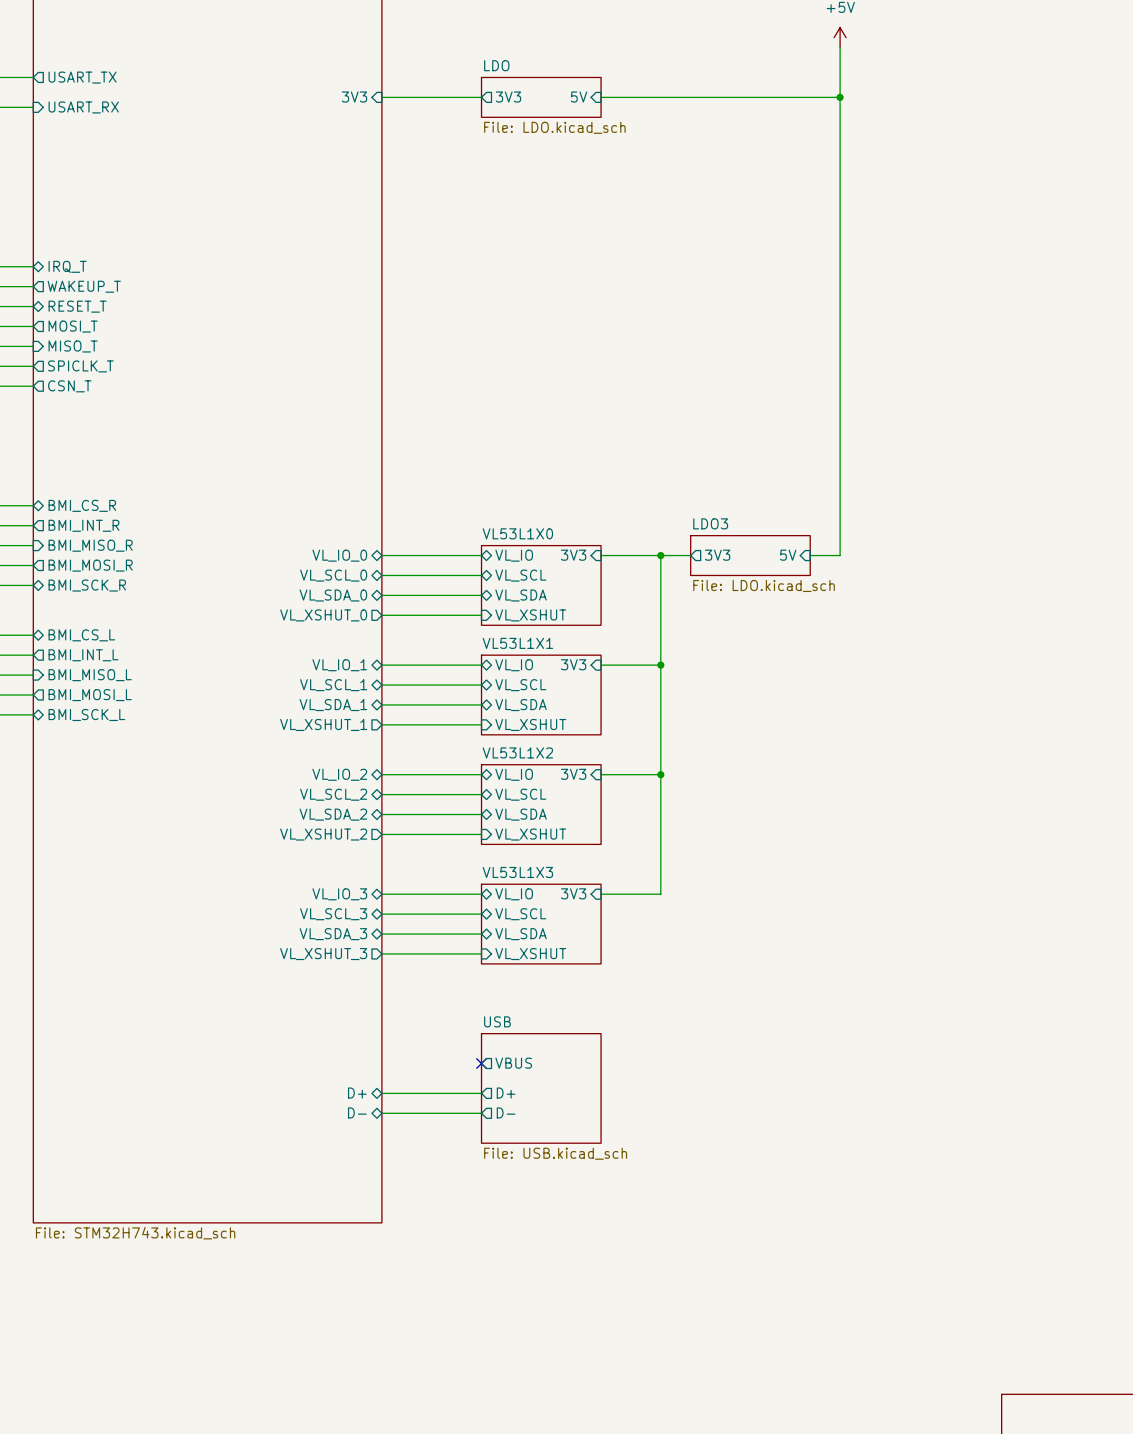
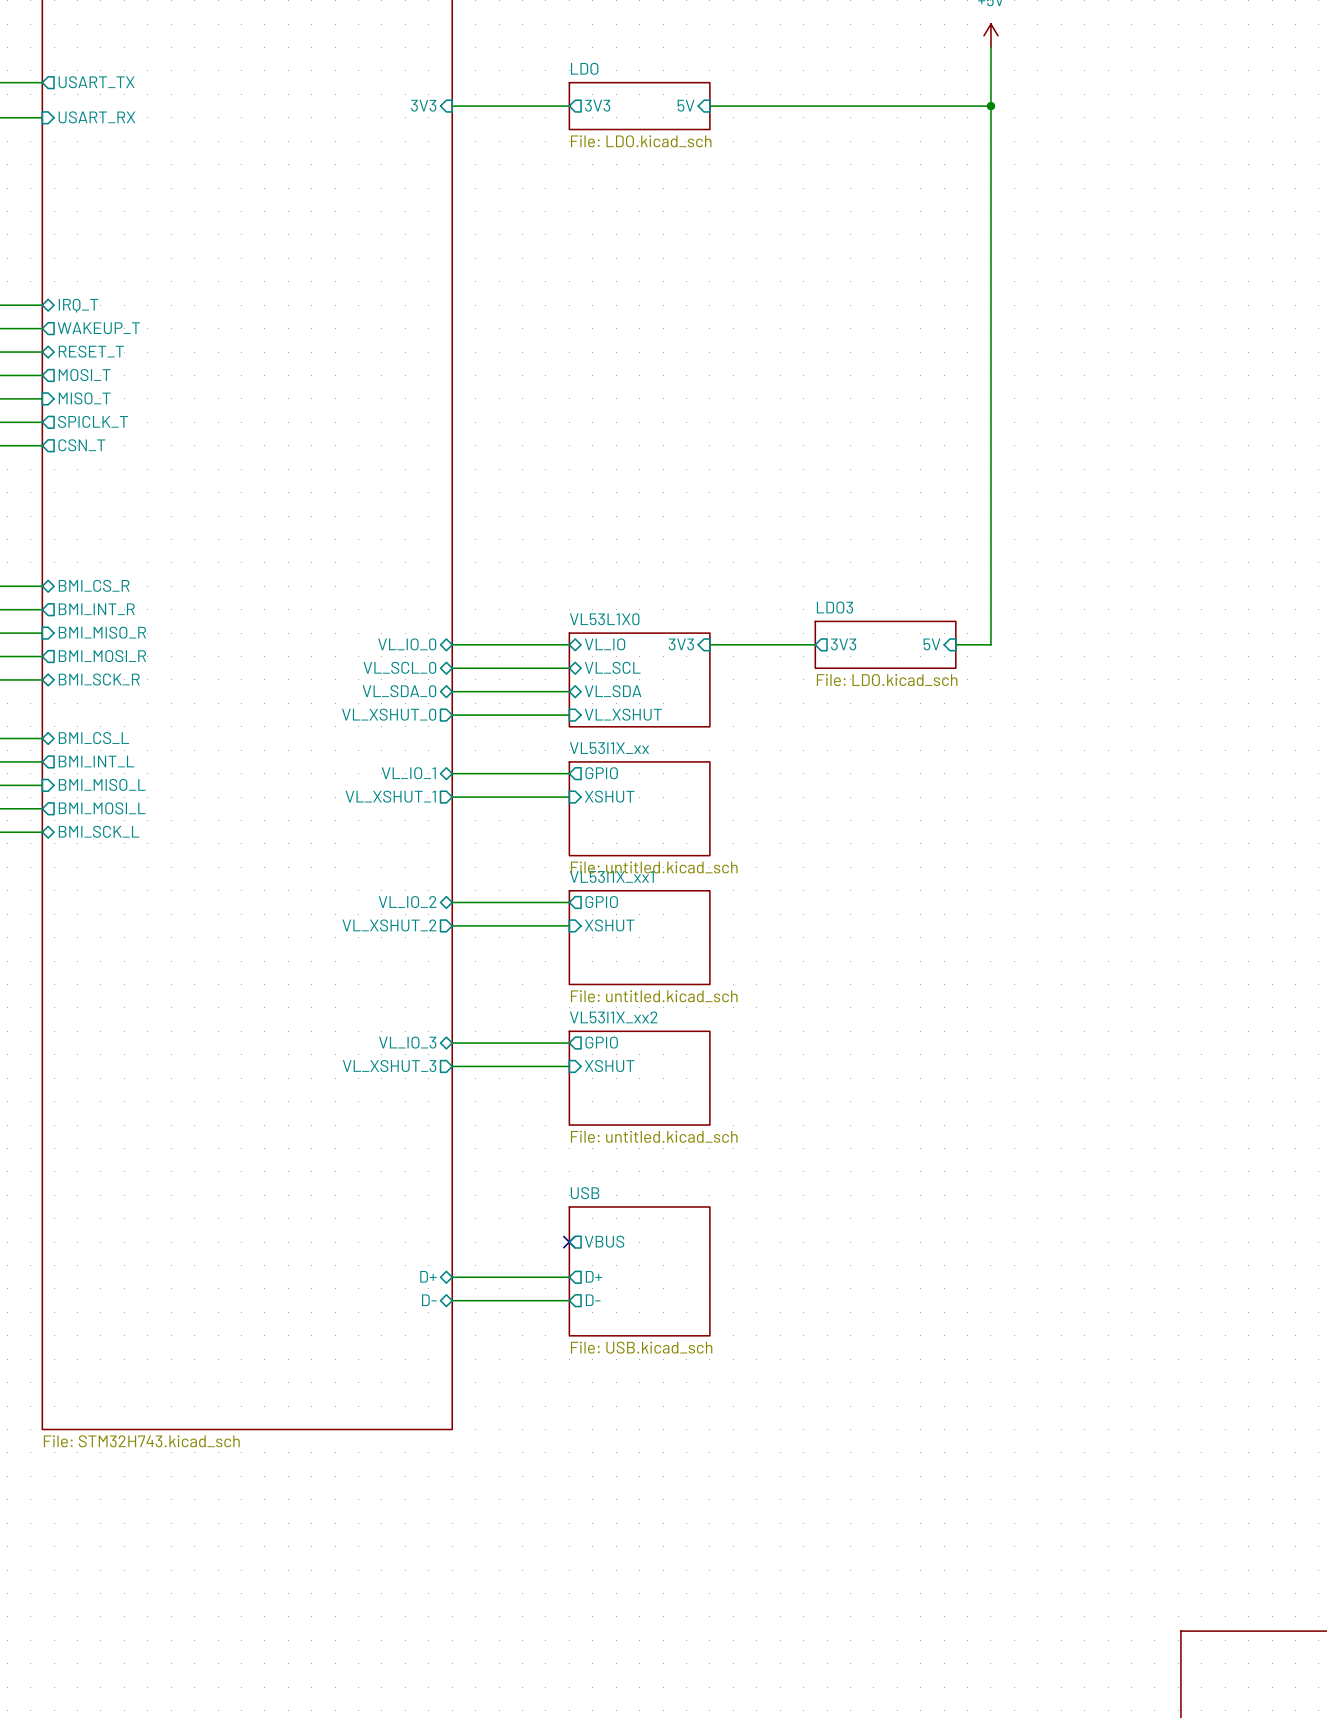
wire: (660, 555) (660, 894) (601, 894) -> none
junction: (660, 555) -> none
sheet VL53L1X1 name: VL53L1X1 (517, 643) -> VL53l1X_xx (609, 748)
sheet pin: 3V3 (573, 664) -> none
sheet pin shape: bidirectional (514, 665) -> output (601, 773)
sheet pin: VL_IO (514, 665) -> GPIO (601, 773)
wire: (601, 665) (660, 665) -> none
junction: (660, 665) -> none
sheet pin shape: bidirectional (333, 685) -> output (390, 796)
sheet pin: VL_SCL_1 (333, 685) -> VL_XSHUT_1 (390, 796)
sheet pin shape: bidirectional (520, 685) -> input (609, 796)
sheet pin: VL_SCL (520, 685) -> XSHUT (609, 796)
wire: (381, 704) (481, 704) -> none
sheet pin: VL_SDA_1 (333, 705) -> none
sheet pin: VL_SDA (521, 705) -> none
sheet pin: VL_XSHUT_1 (323, 724) -> none
wire: (381, 724) (481, 724) -> none
sheet pin: VL_XSHUT (530, 724) -> none
sheet VL53L1X1 value: none -> File: untitled.kicad_sch (654, 867)
sheet VL53L1X2 name: VL53L1X2 (517, 752) -> VL53l1X_xx1 (611, 876)
sheet pin shape: bidirectional (514, 774) -> output (601, 902)
sheet pin: VL_IO (514, 774) -> GPIO (601, 902)
sheet pin: 3V3 (573, 774) -> none
wire: (601, 774) (660, 774) -> none
junction: (660, 774) -> none
sheet pin shape: bidirectional (333, 794) -> output (389, 925)
sheet pin: VL_SCL_2 (333, 794) -> VL_XSHUT_2 (389, 925)
sheet pin shape: bidirectional (520, 794) -> input (609, 925)
sheet pin: VL_SCL (520, 794) -> XSHUT (609, 925)
sheet pin: VL_SDA_2 (333, 814) -> none
wire: (381, 814) (481, 814) -> none
sheet pin: VL_SDA (521, 814) -> none
sheet pin: VL_XSHUT_2 (323, 834) -> none
wire: (381, 834) (481, 834) -> none
sheet pin: VL_XSHUT (530, 834) -> none
sheet VL53L1X2 value: none -> File: untitled.kicad_sch (654, 996)
sheet VL53L1X3 name: VL53L1X3 (517, 872) -> VL53l1X_xx2 (613, 1017)
sheet pin: 3V3 (573, 893) -> none
sheet pin shape: bidirectional (514, 894) -> output (601, 1042)
sheet pin: VL_IO (514, 894) -> GPIO (601, 1042)
sheet pin shape: bidirectional (333, 914) -> output (389, 1066)
sheet pin: VL_SCL_3 (333, 914) -> VL_XSHUT_3 (389, 1066)
sheet pin shape: bidirectional (520, 914) -> input (609, 1066)
sheet pin: VL_SCL (520, 914) -> XSHUT (609, 1066)
sheet pin: VL_SDA_3 (333, 934) -> none
wire: (381, 934) (481, 934) -> none
sheet pin: VL_SDA (521, 934) -> none
wire: (381, 953) (481, 953) -> none
sheet pin: VL_XSHUT_3 (323, 954) -> none
sheet pin: VL_XSHUT (530, 954) -> none
sheet VL53L1X3 value: none -> File: untitled.kicad_sch (654, 1136)

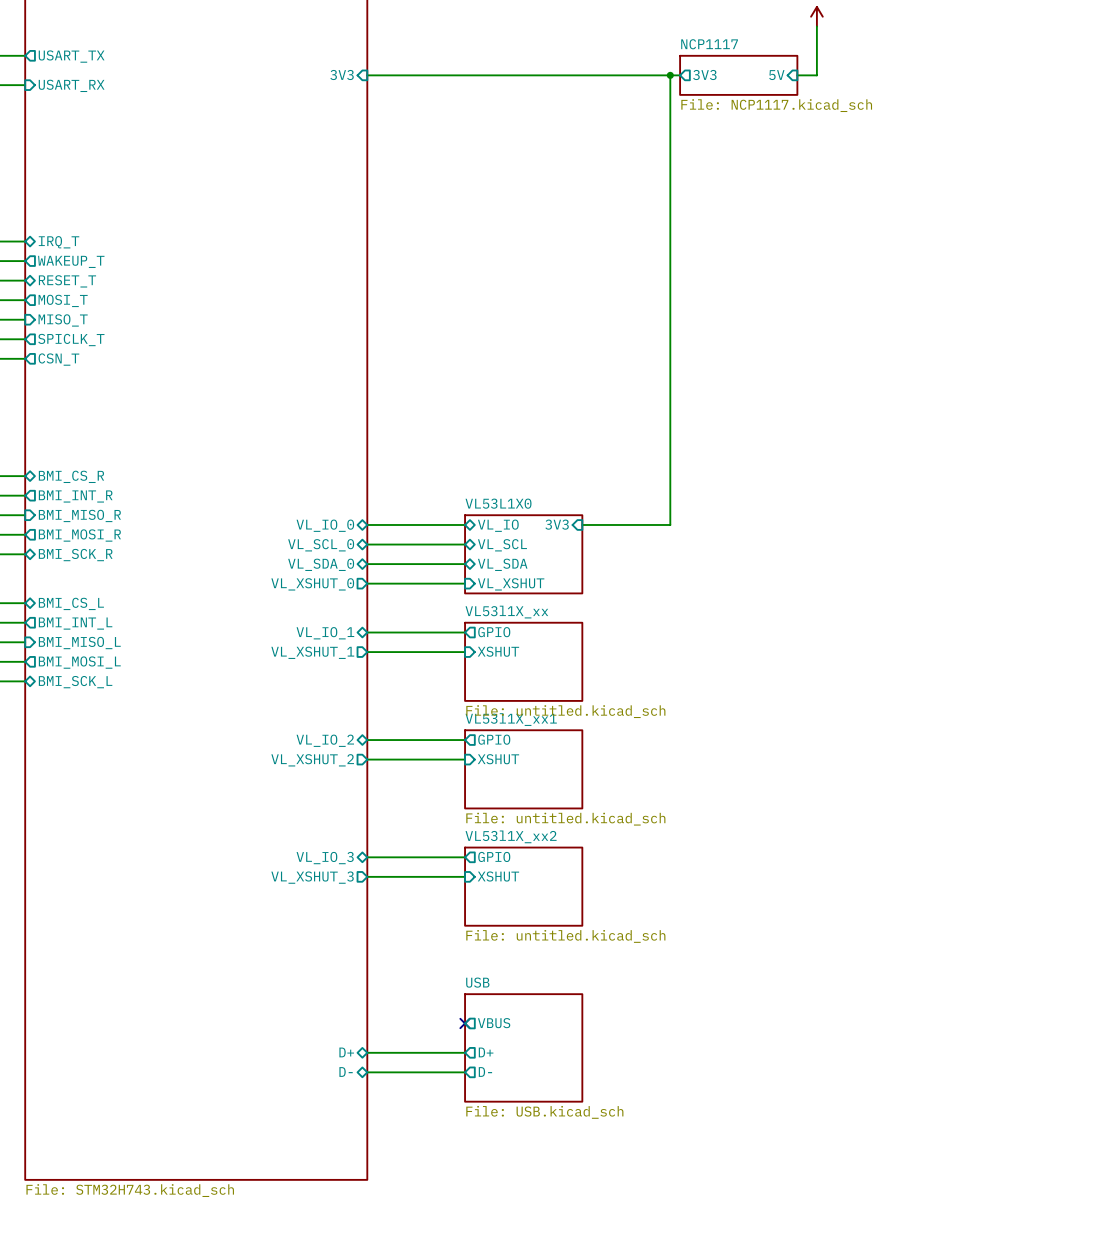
sheet pin: 3V3 (597, 105) -> none
sheet pin: 5V (686, 105) -> none
sheet pin: none -> 3V3 (704, 75)
sheet pin: none -> 5V (776, 75)
wire: none -> (465, 75) (582, 75)
sheet LDO: File: LDO.kicad_sch (639, 106) -> none
wire: none -> (670, 75) (670, 524)
junction: none -> (670, 75)
wire: (827, 106) (967, 106) -> none
sheet NCP1117: none -> File: NCP1117.kicad_sch (738, 75)
wire: (990, 106) (990, 644) (955, 644) -> none
junction: (990, 106) -> none
sheet pin: 3V3 (843, 644) -> none
sheet LDO3: File: LDO.kicad_sch (885, 644) -> none
sheet pin: 5V (932, 644) -> none

